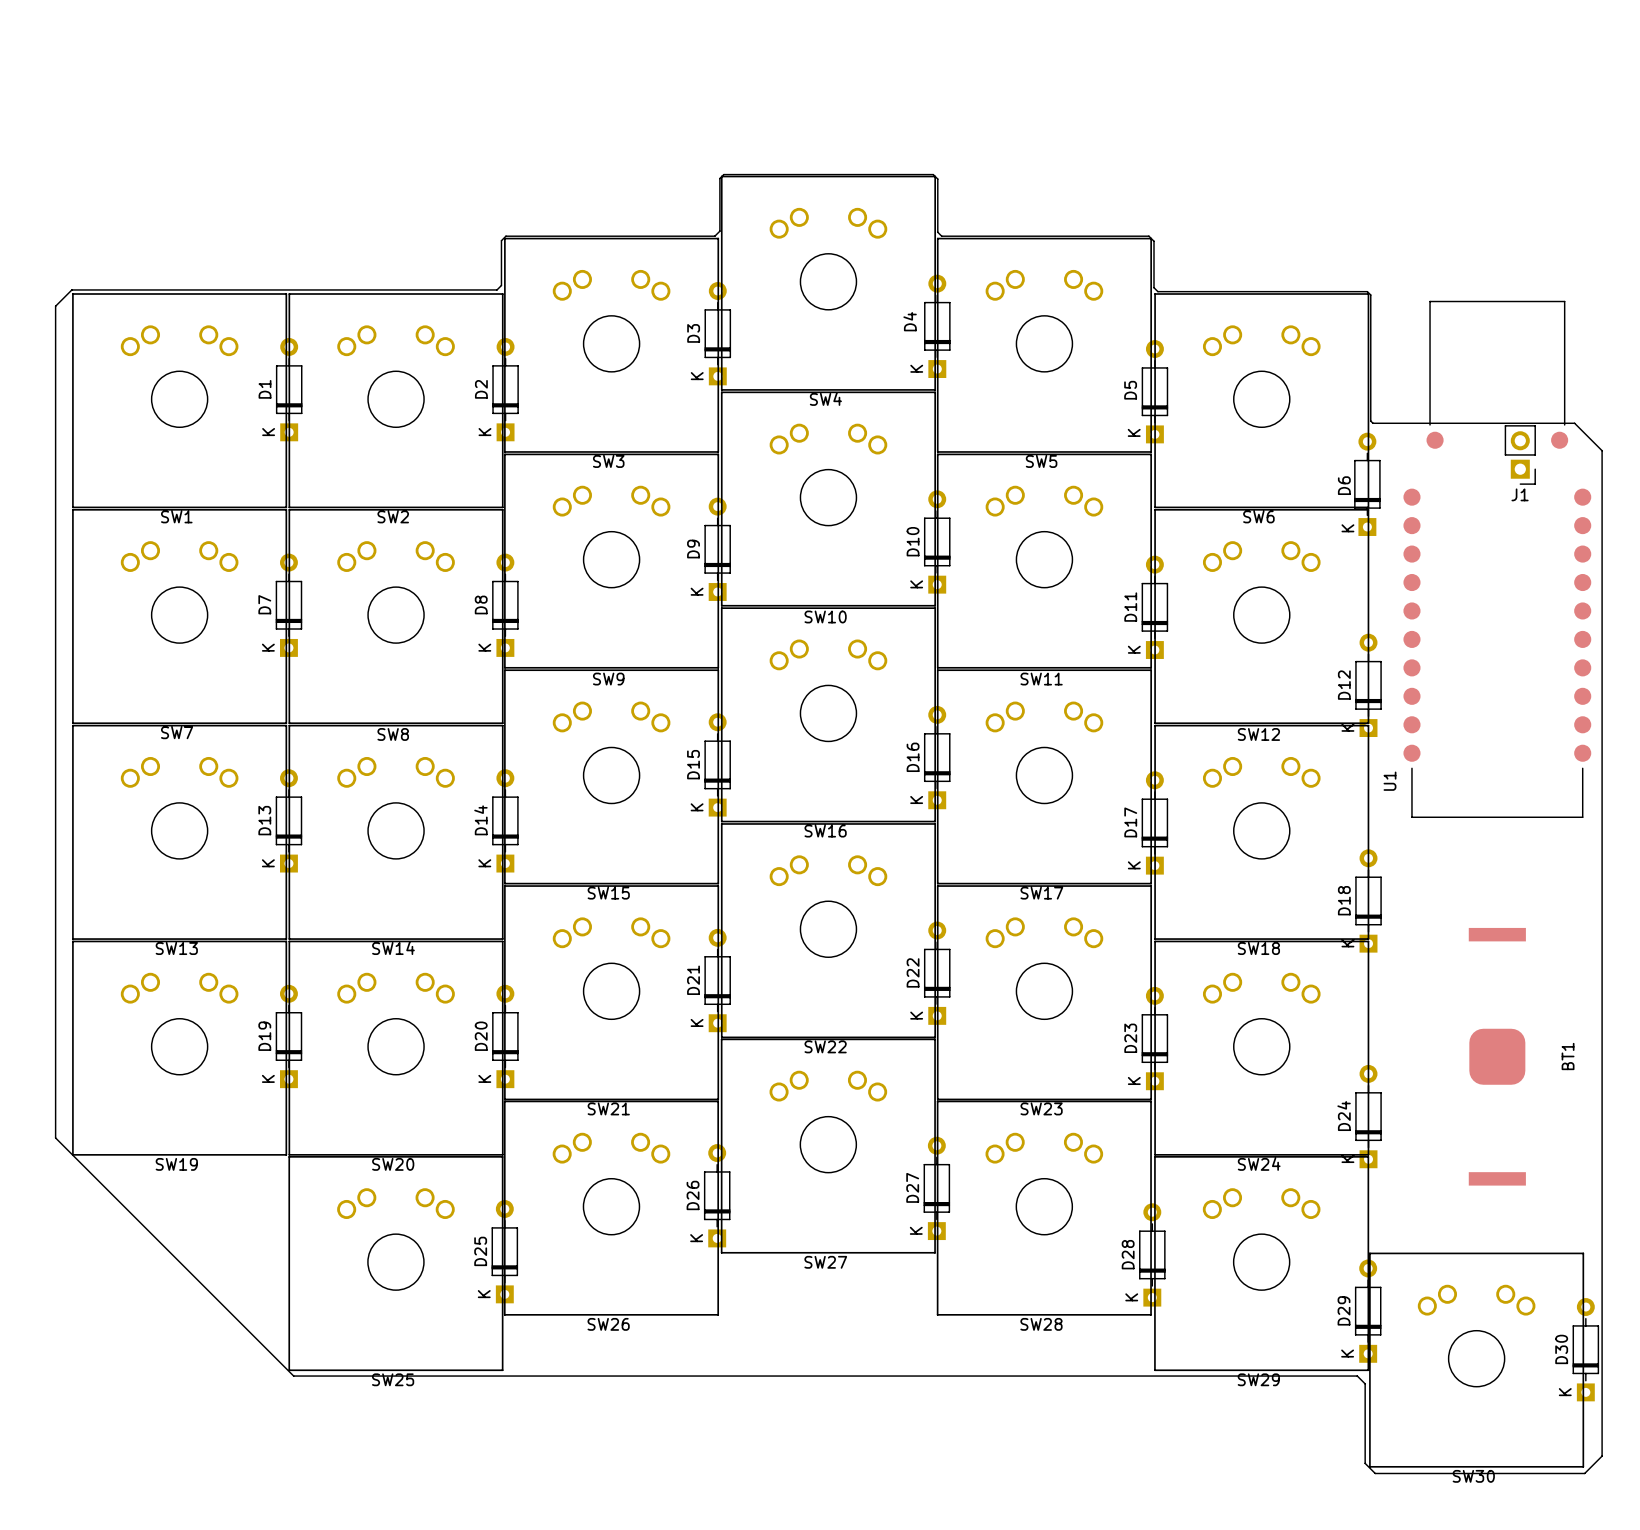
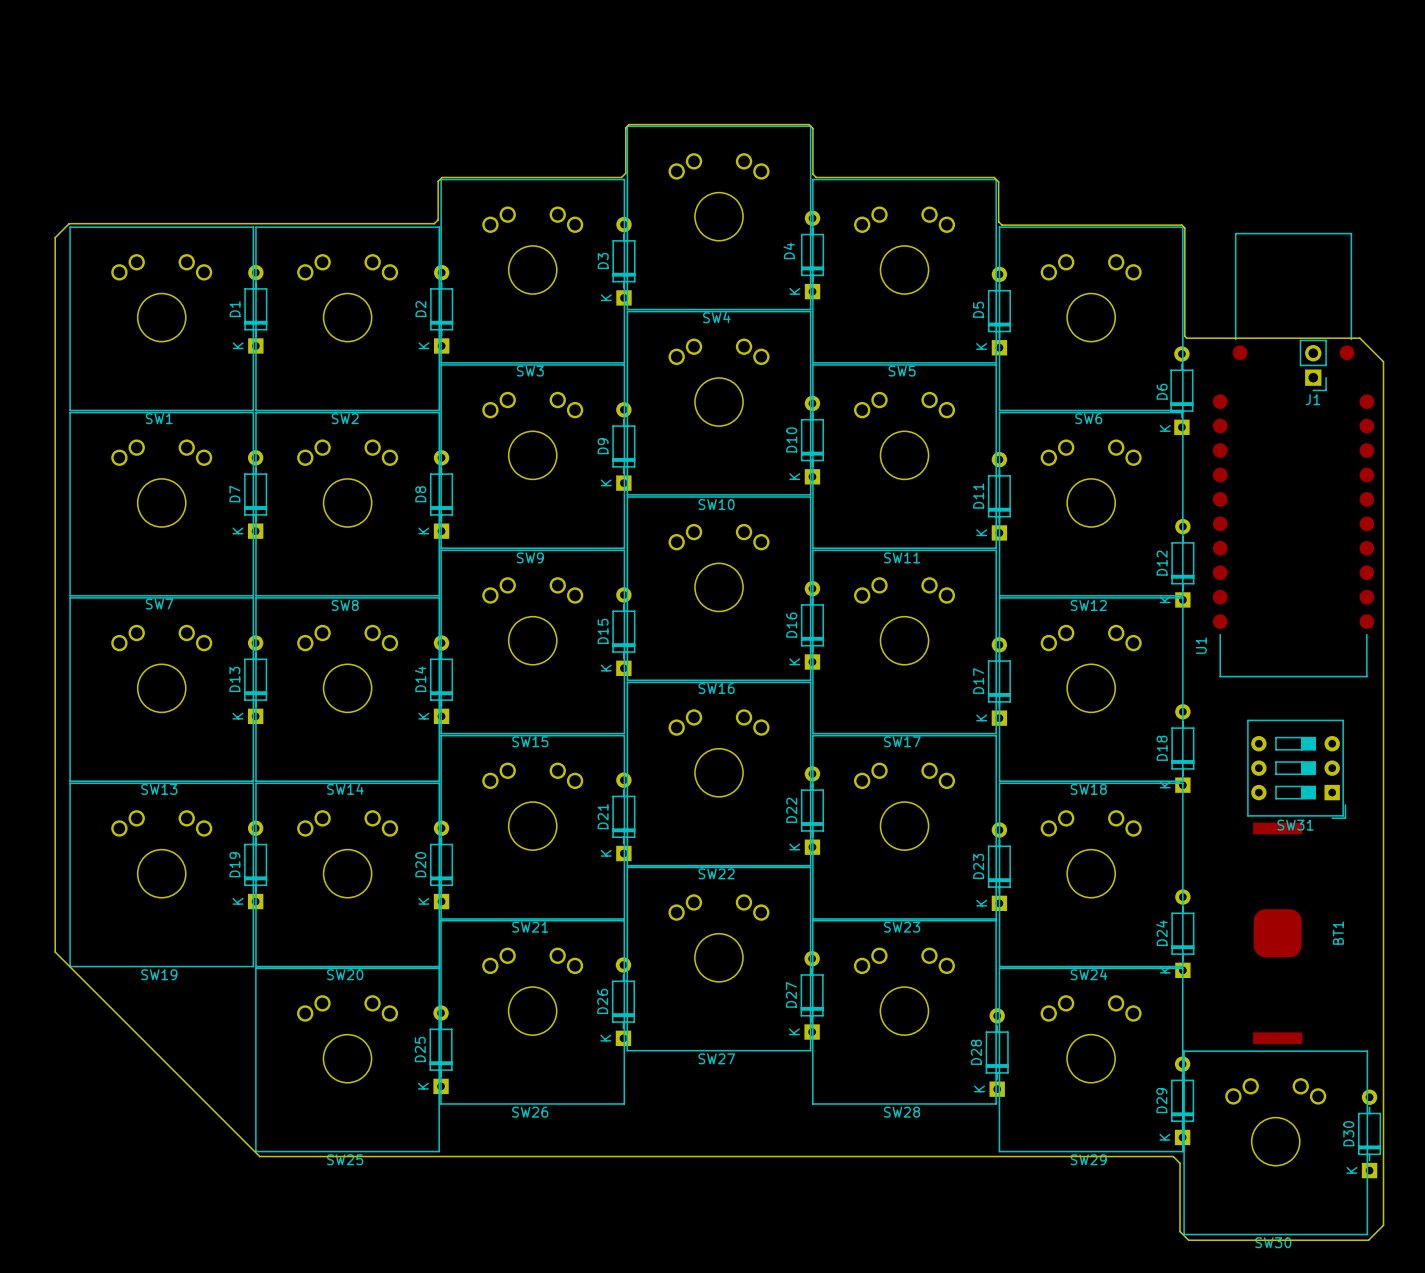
SW31: none -> (1296, 769)
BT1 position: (1497, 1056) -> (1277, 933)

